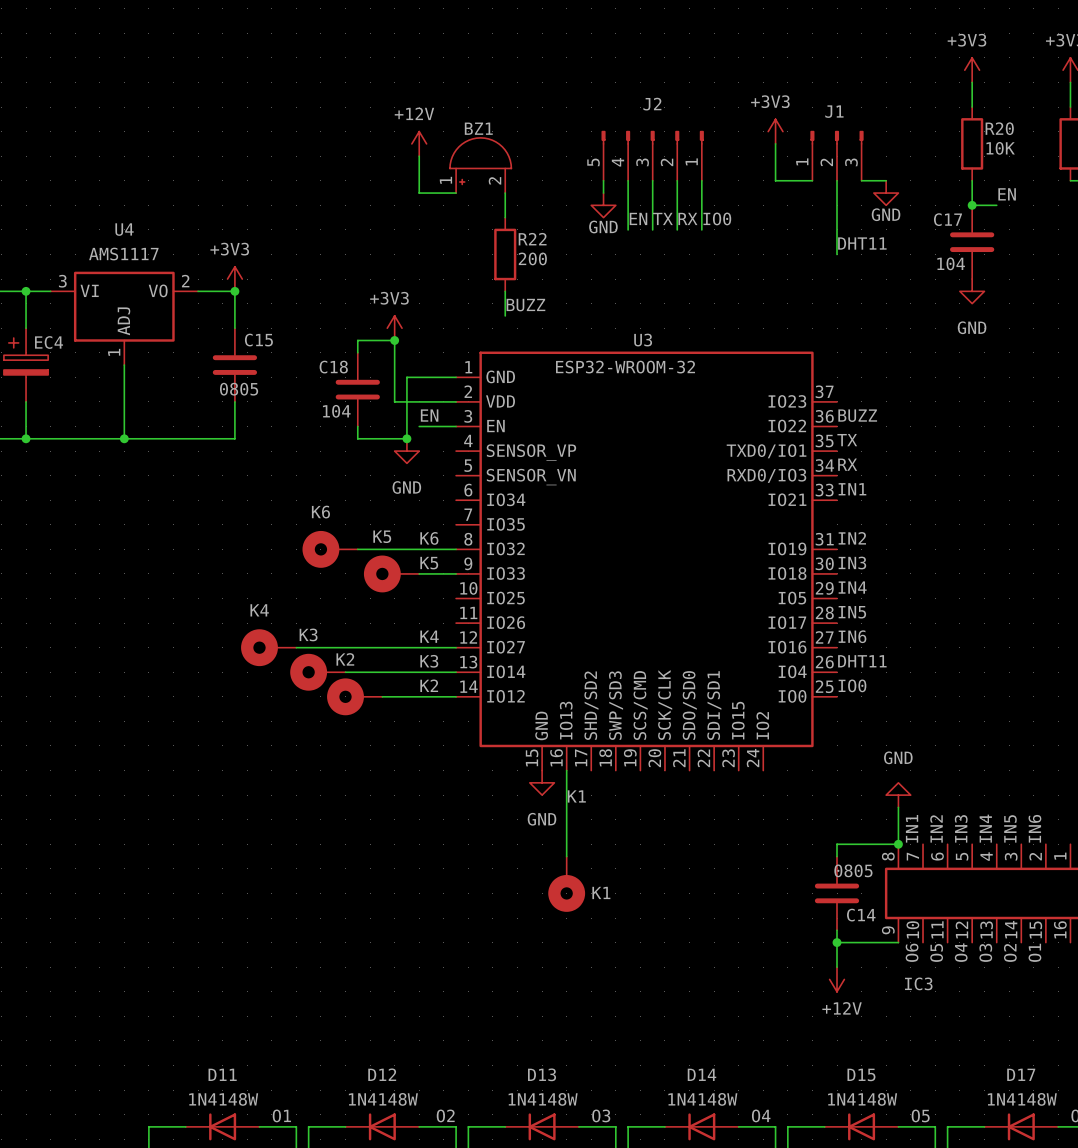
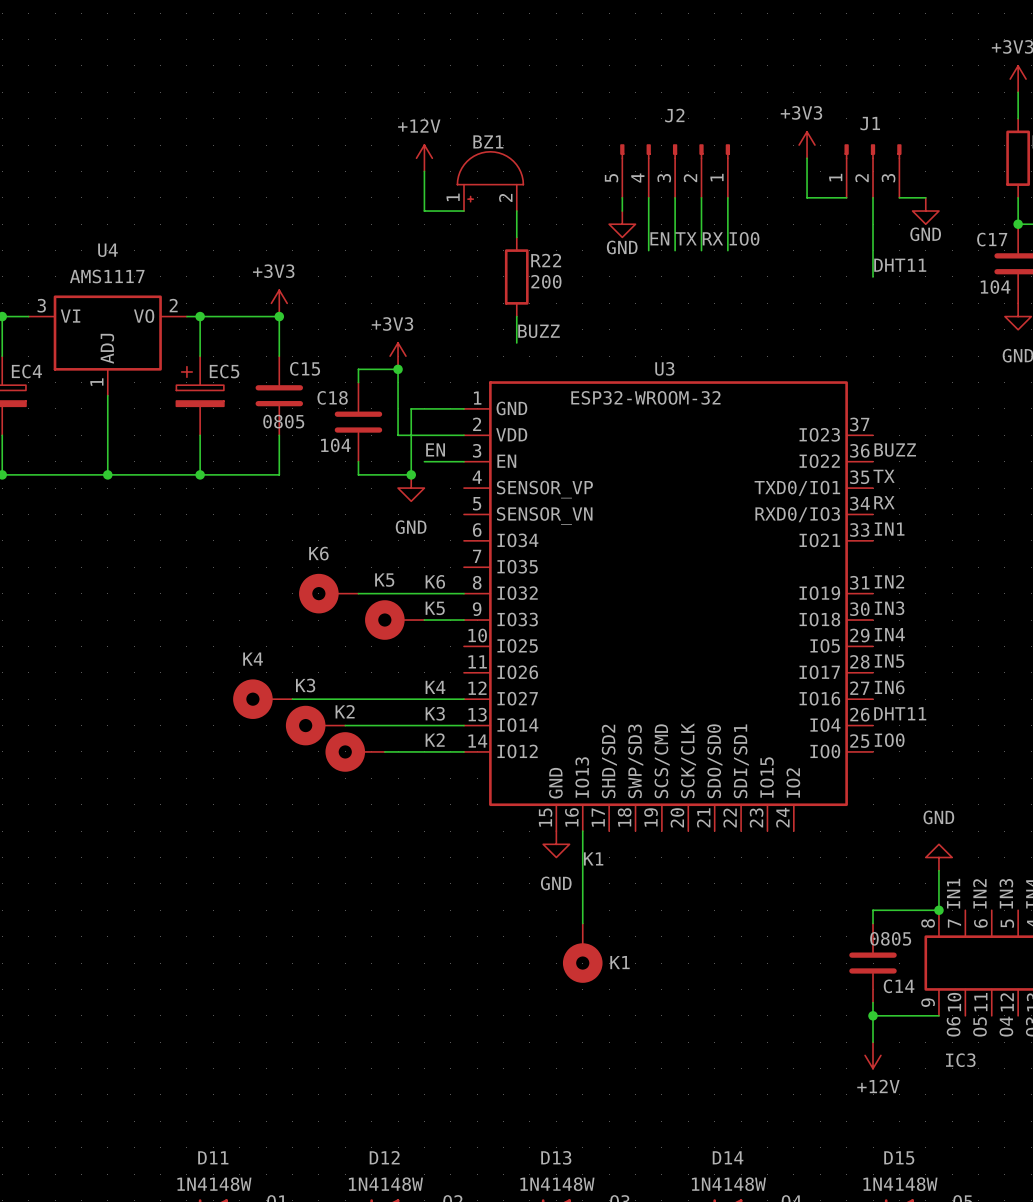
power symbol position: +3V3 (234, 279) -> +3V3 (279, 303)
wire: none -> (200, 316) (200, 356)
junction: none -> (200, 316)
wire: (234, 291) (234, 328) -> (226, 316) (279, 316) (279, 356)
junction: (234, 291) -> none
junction: none -> (279, 316)
EC5: none -> (200, 395)
C15 position: (234, 365) -> (279, 395)
wire: none -> (200, 435) (200, 474)
wire: (234, 401) (234, 438) -> (279, 435) (279, 474) (226, 474)
junction: none -> (200, 474)

